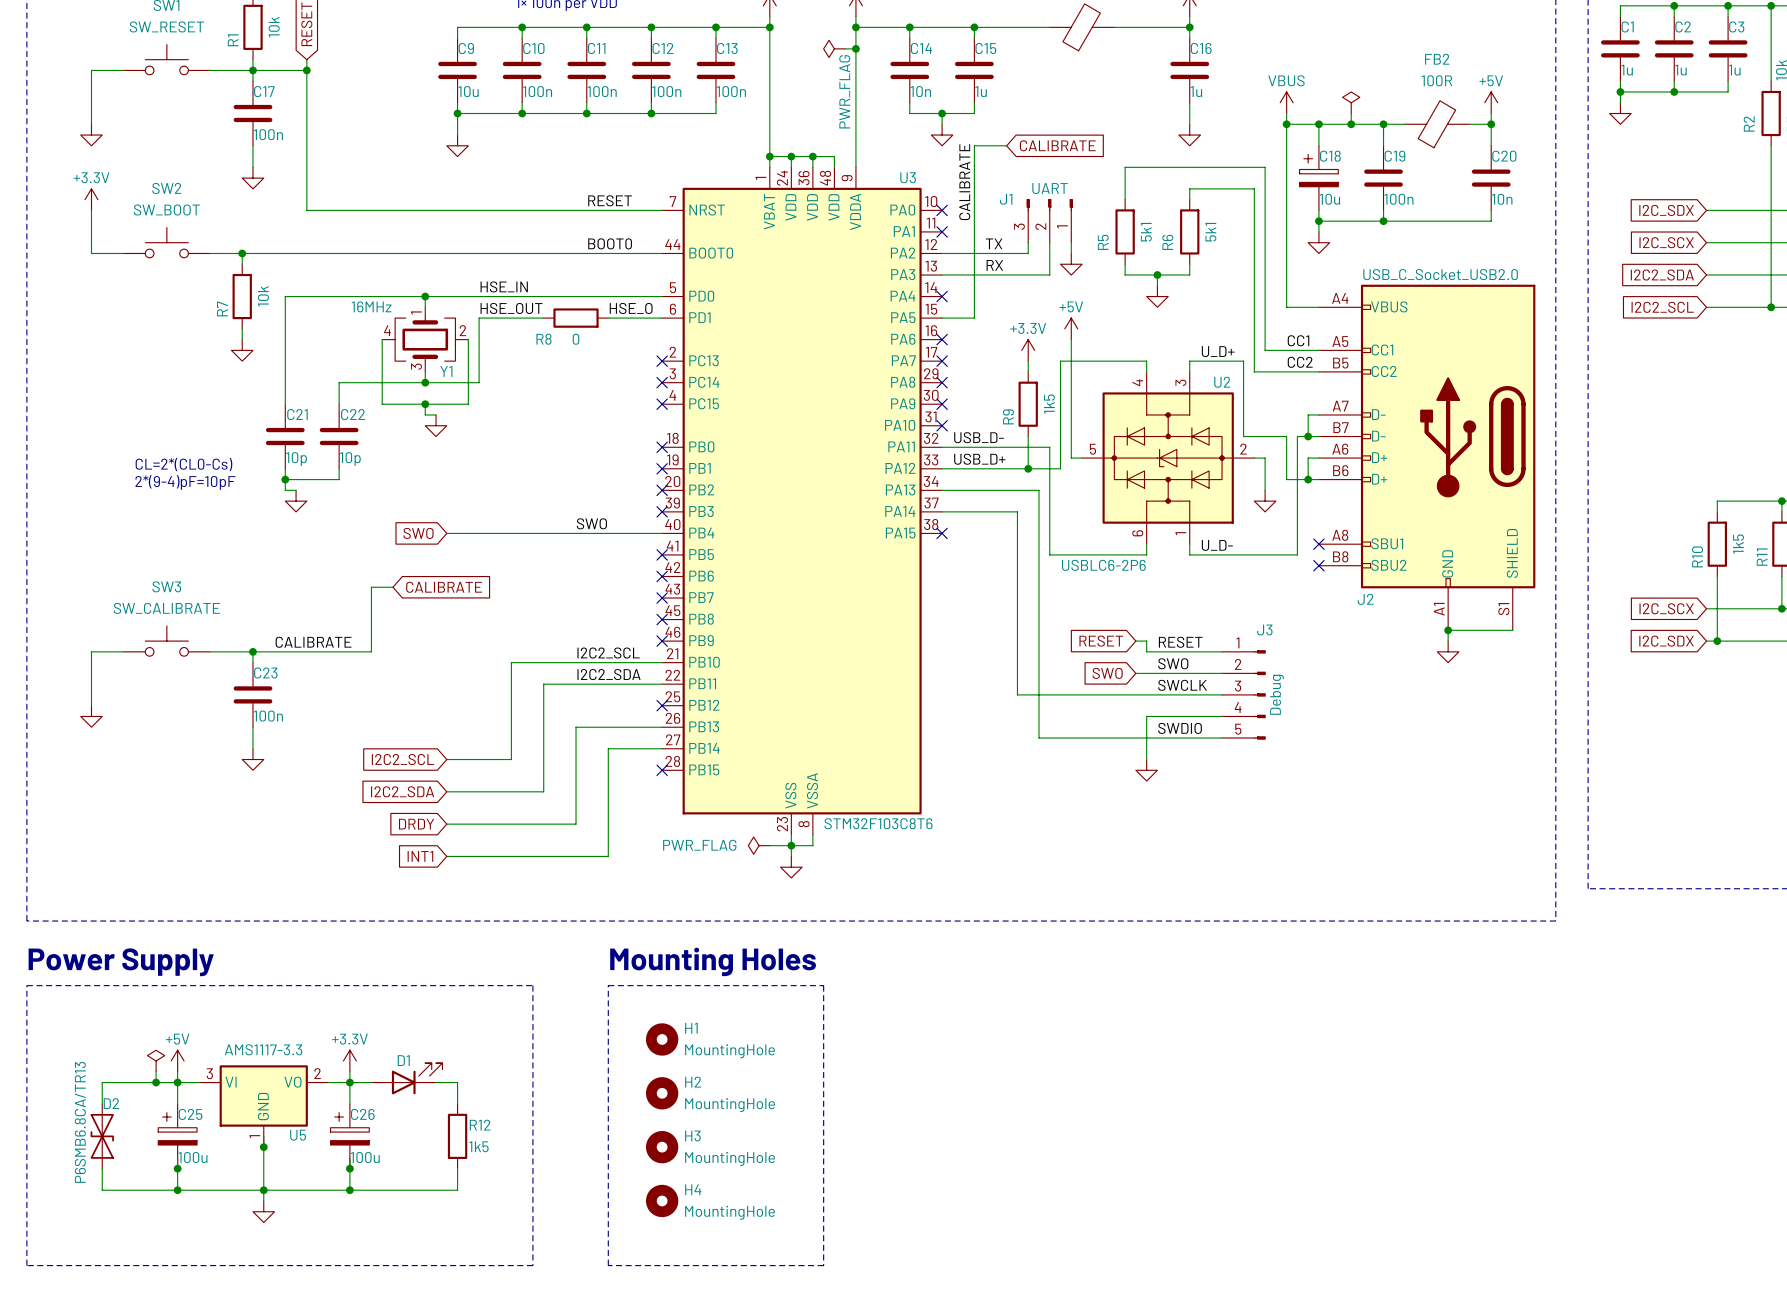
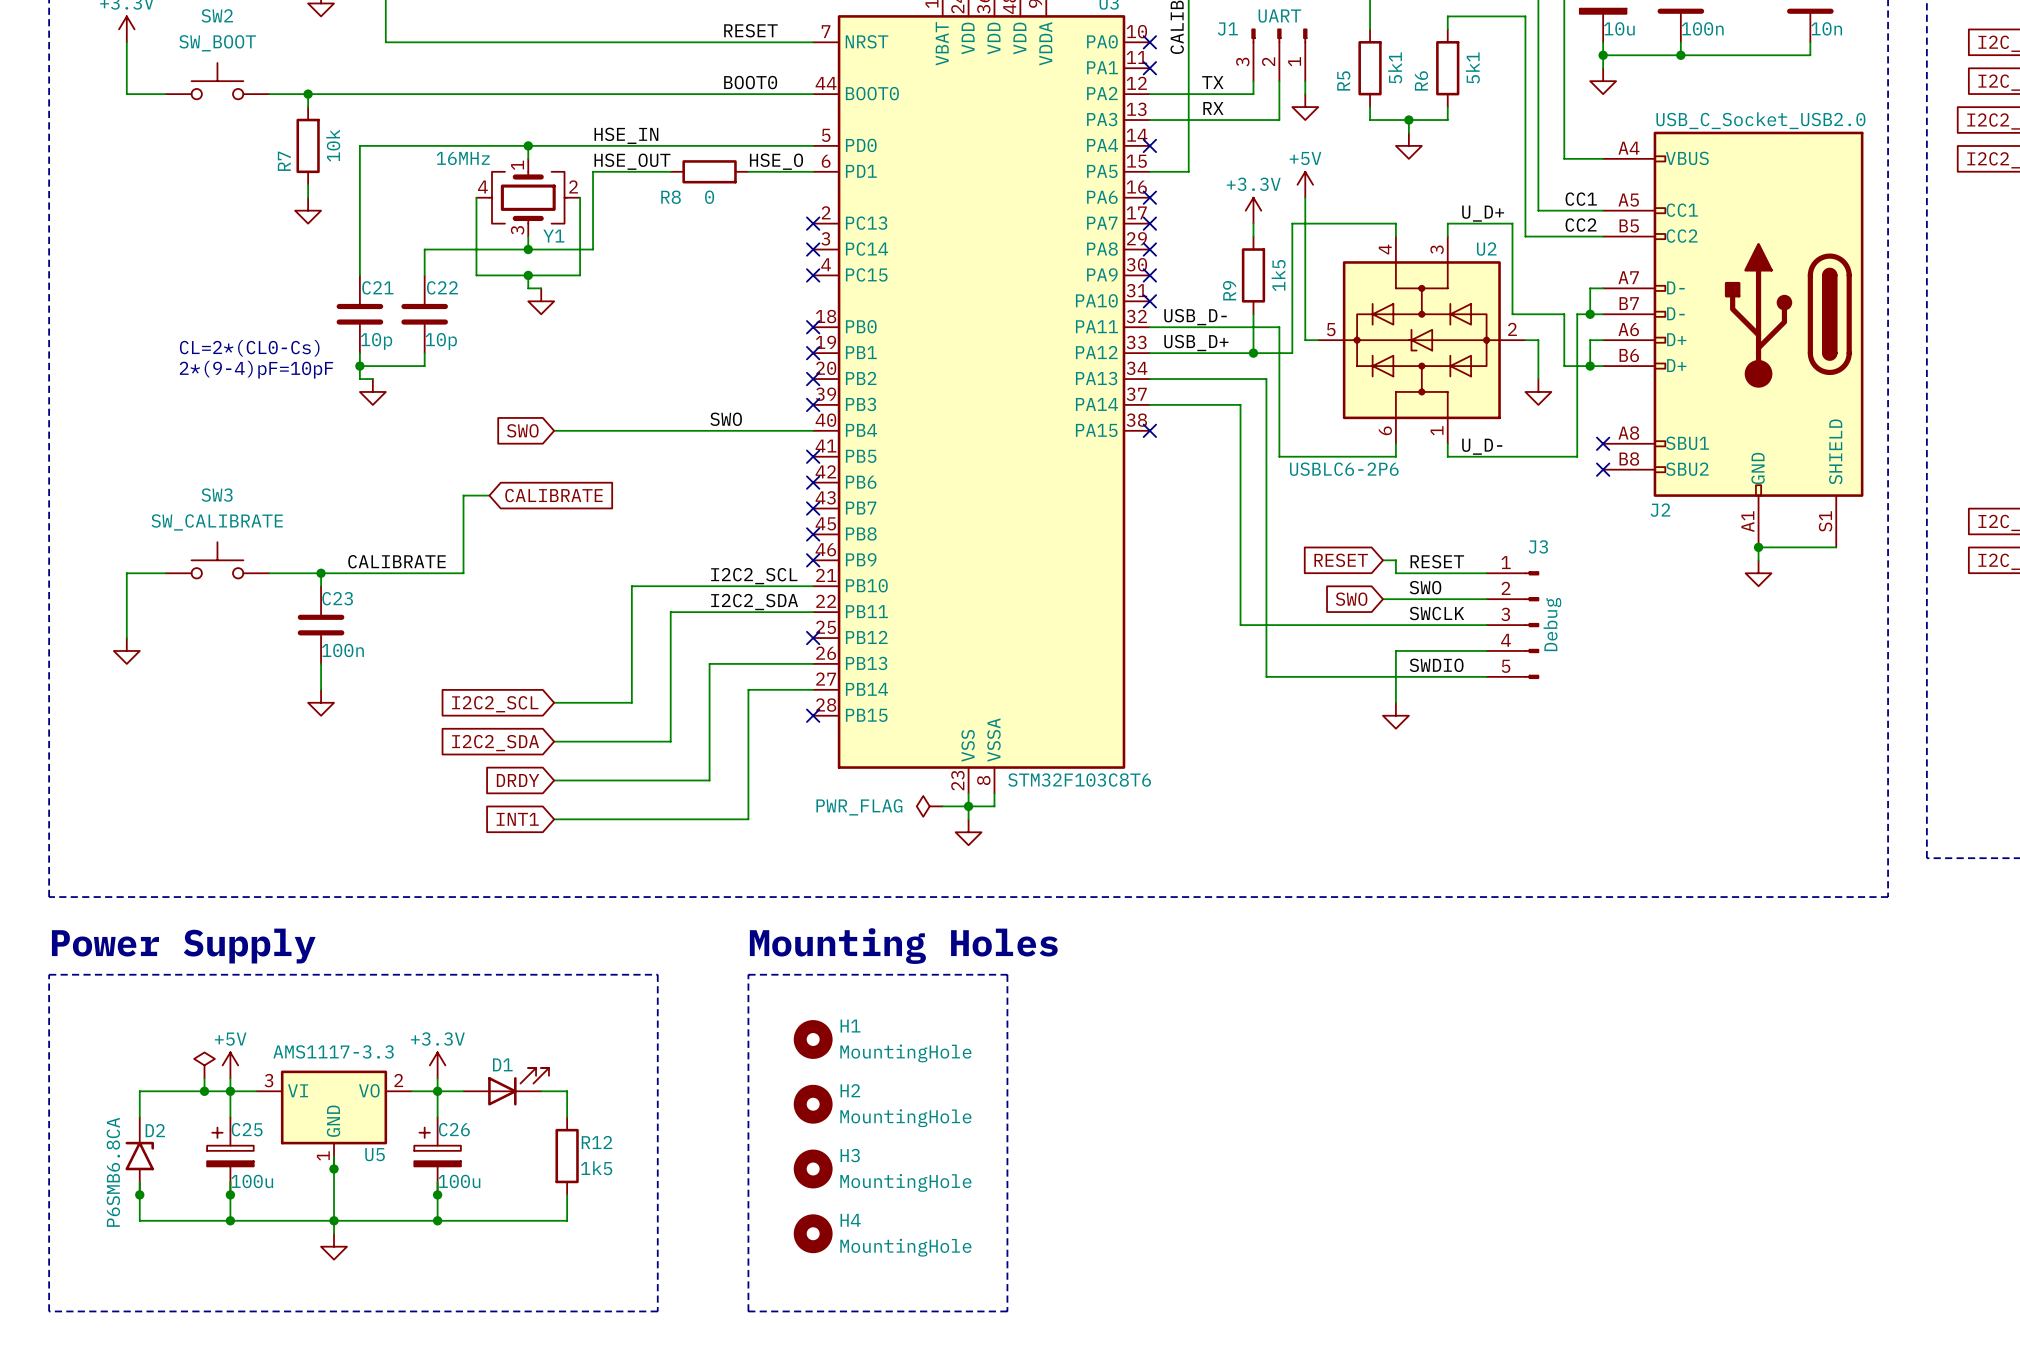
D2 symbol: [90, 1104, 114, 1169] -> [125, 1117, 155, 1195]
D2 value: P6SMB6.8CA/TR13 (80, 1122) -> P6SMB6.8CA (113, 1172)
junction: none -> (139, 1194)

